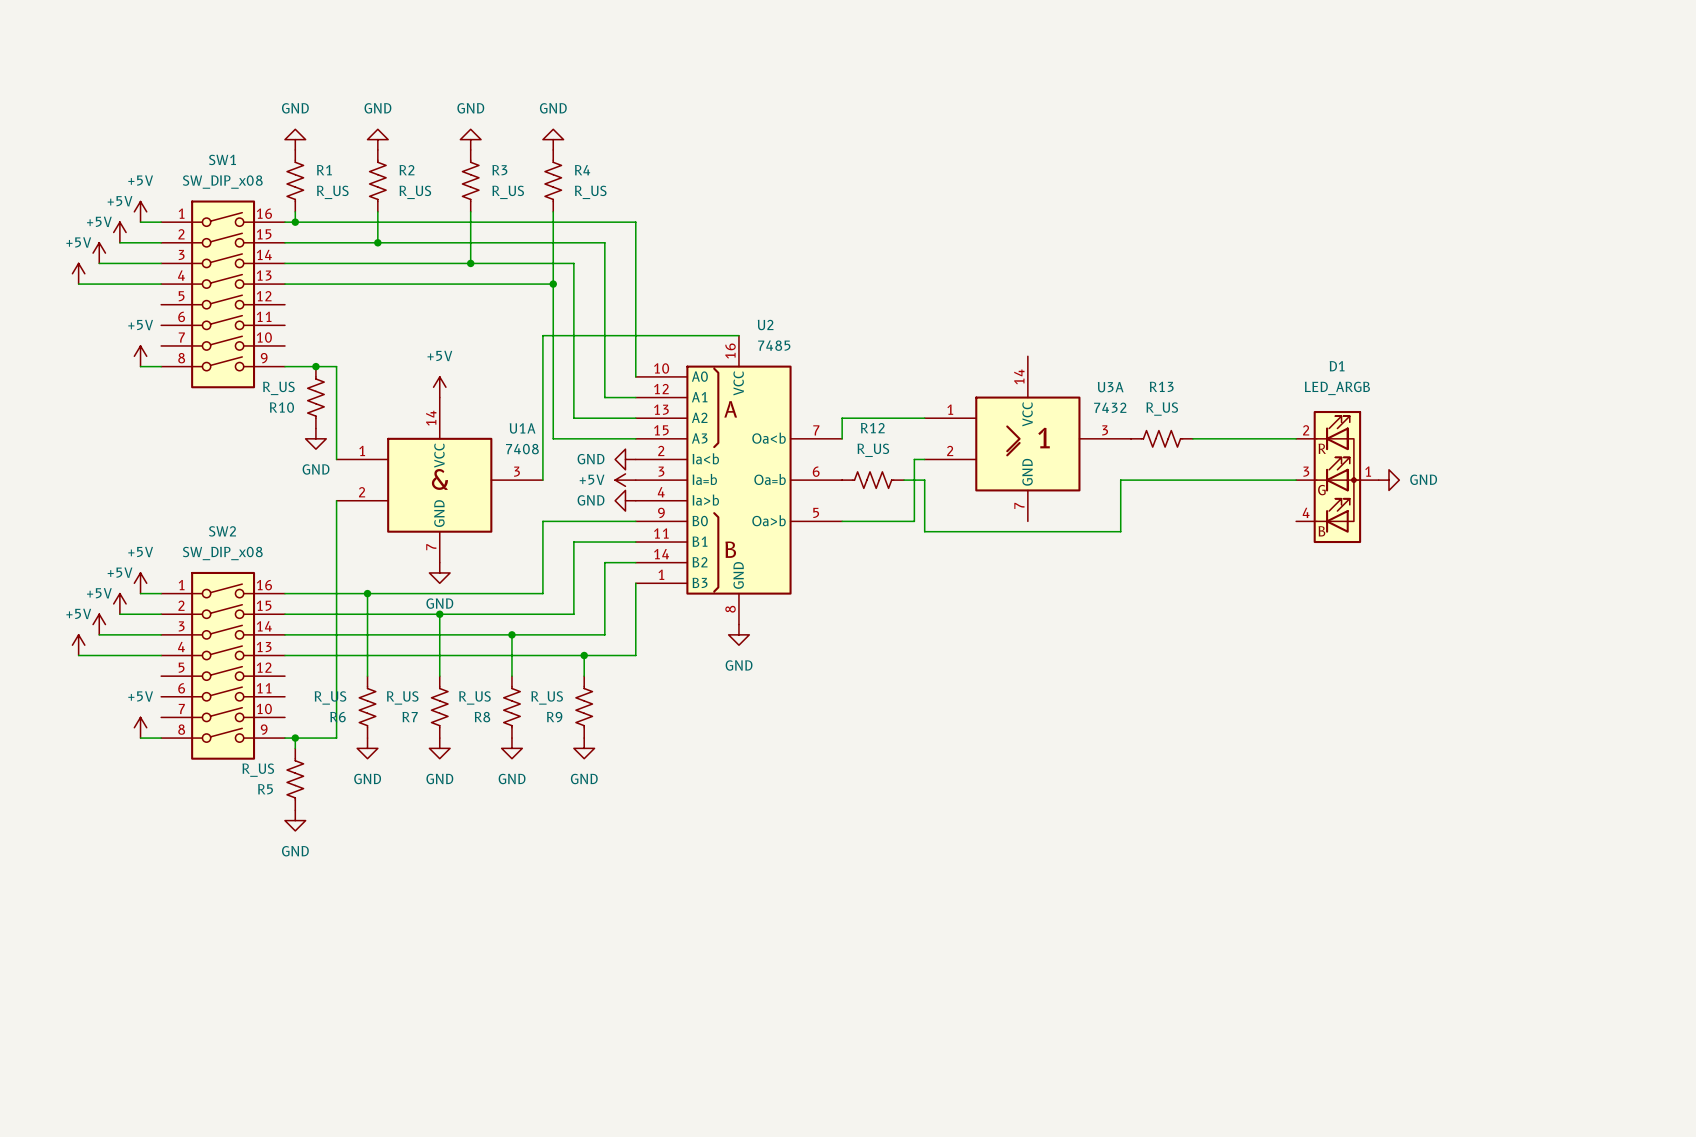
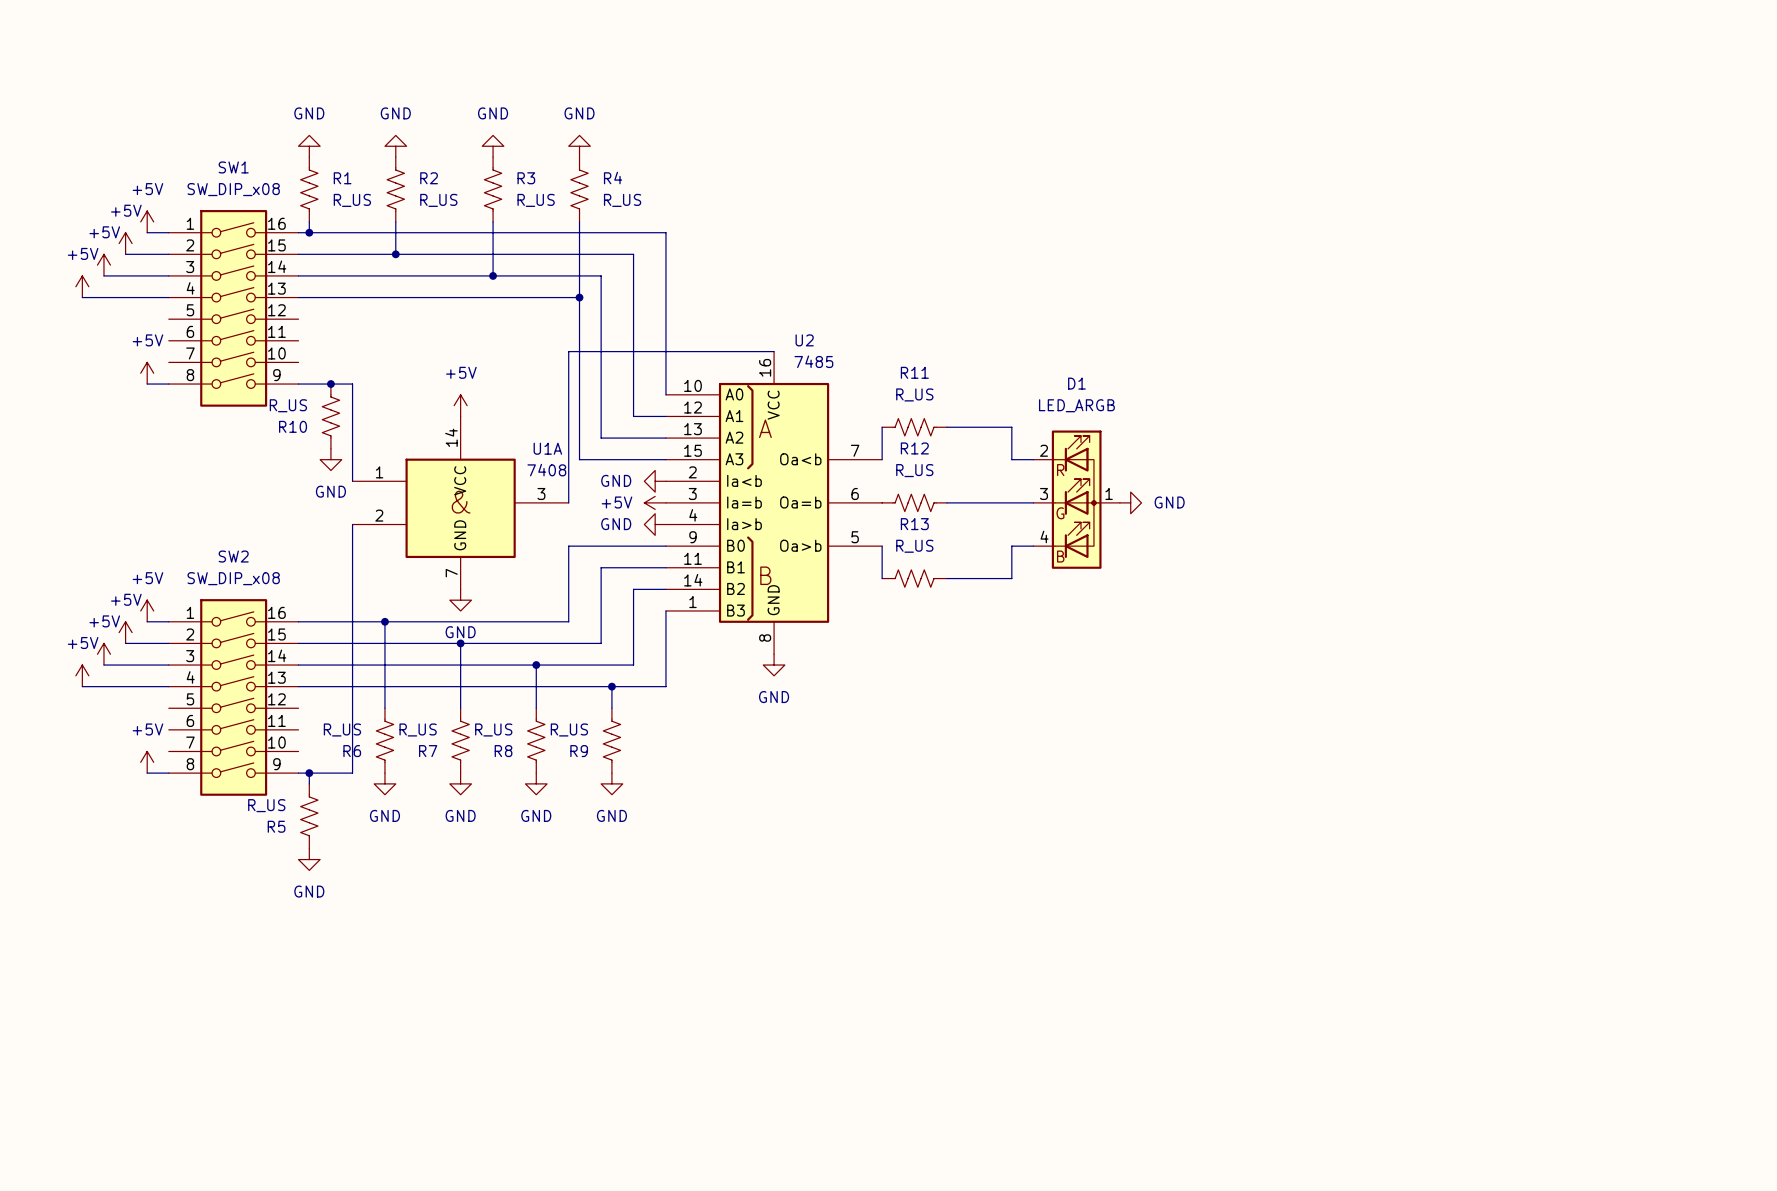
R11: none -> R_US (914, 427)
wire: none -> (946, 427) (1011, 427) (1011, 459) (1033, 459)
wire: (842, 418) (924, 418) -> (882, 438) (882, 427)
U3A: 7432 (1027, 438) -> none
R13 position: (1161, 438) -> (914, 578)
wire: (1192, 438) (1296, 438) -> none
wire: (924, 459) (914, 459) (914, 521) (842, 521) -> (882, 578) (882, 546)
D1 position: (1337, 477) -> (1076, 499)
wire: (924, 480) (924, 531) (1120, 531) (1120, 480) (1296, 480) -> (968, 502) (1033, 502)
power symbol: none -> GND (1130, 502)
power symbol: GND (1388, 480) -> none
wire: none -> (1033, 546) (1011, 546) (1011, 578) (946, 578)

